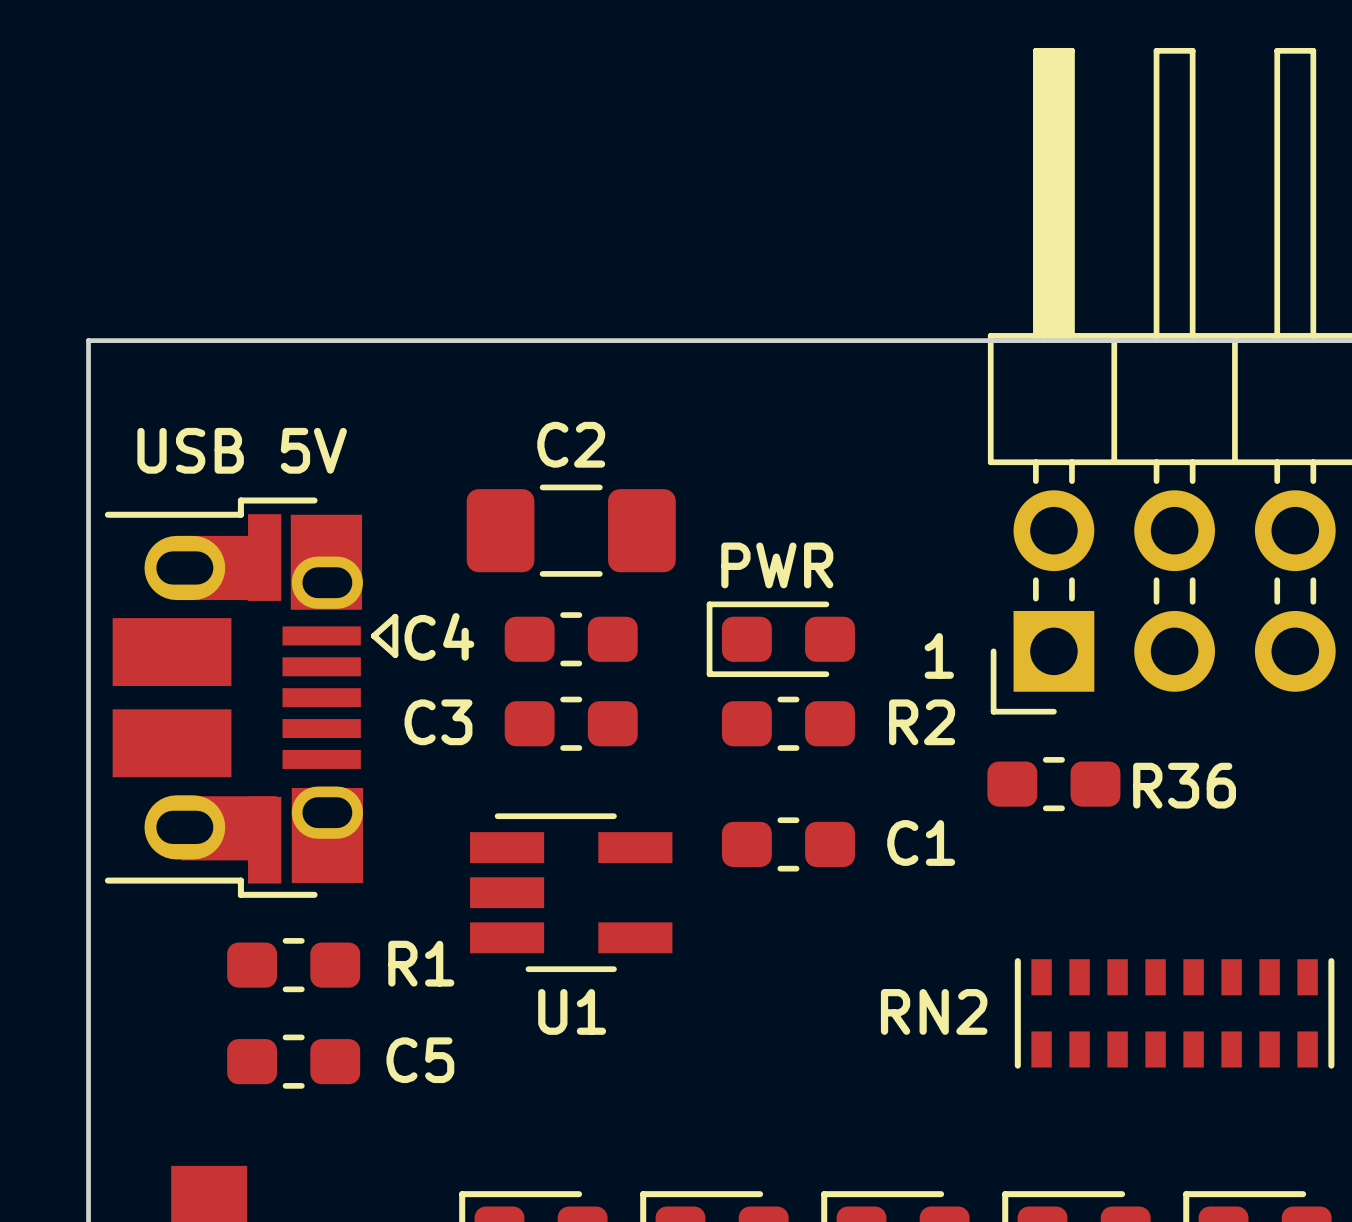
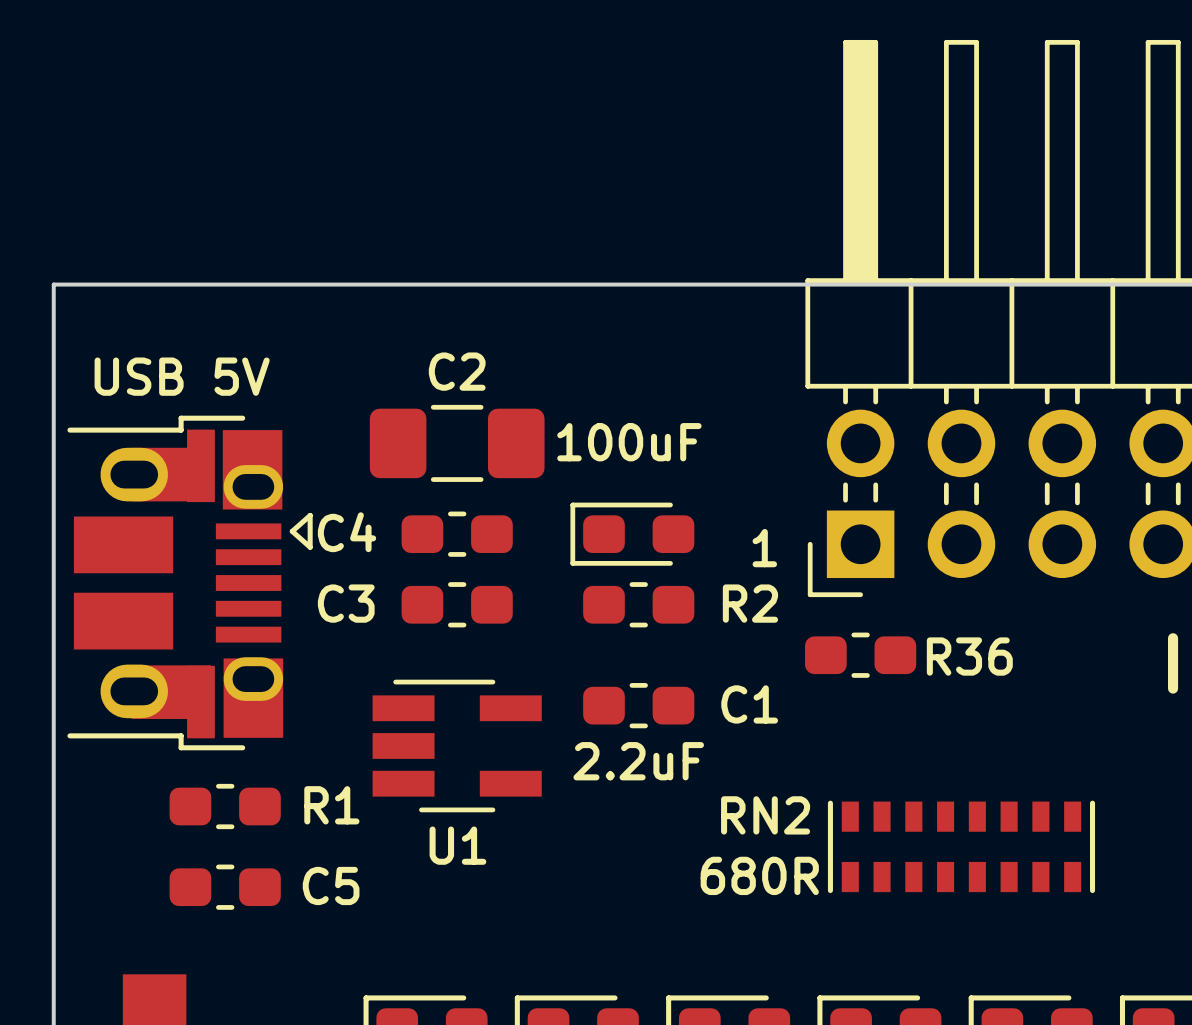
C2 value: none -> 100uF (629, 442)
text: PWR (777, 565) -> none
C1 value: none -> 2.2uF (638, 761)
RN2 name position: RN2 (934, 1011) -> RN2 (765, 815)
RN2 value: none -> 680R (759, 875)

